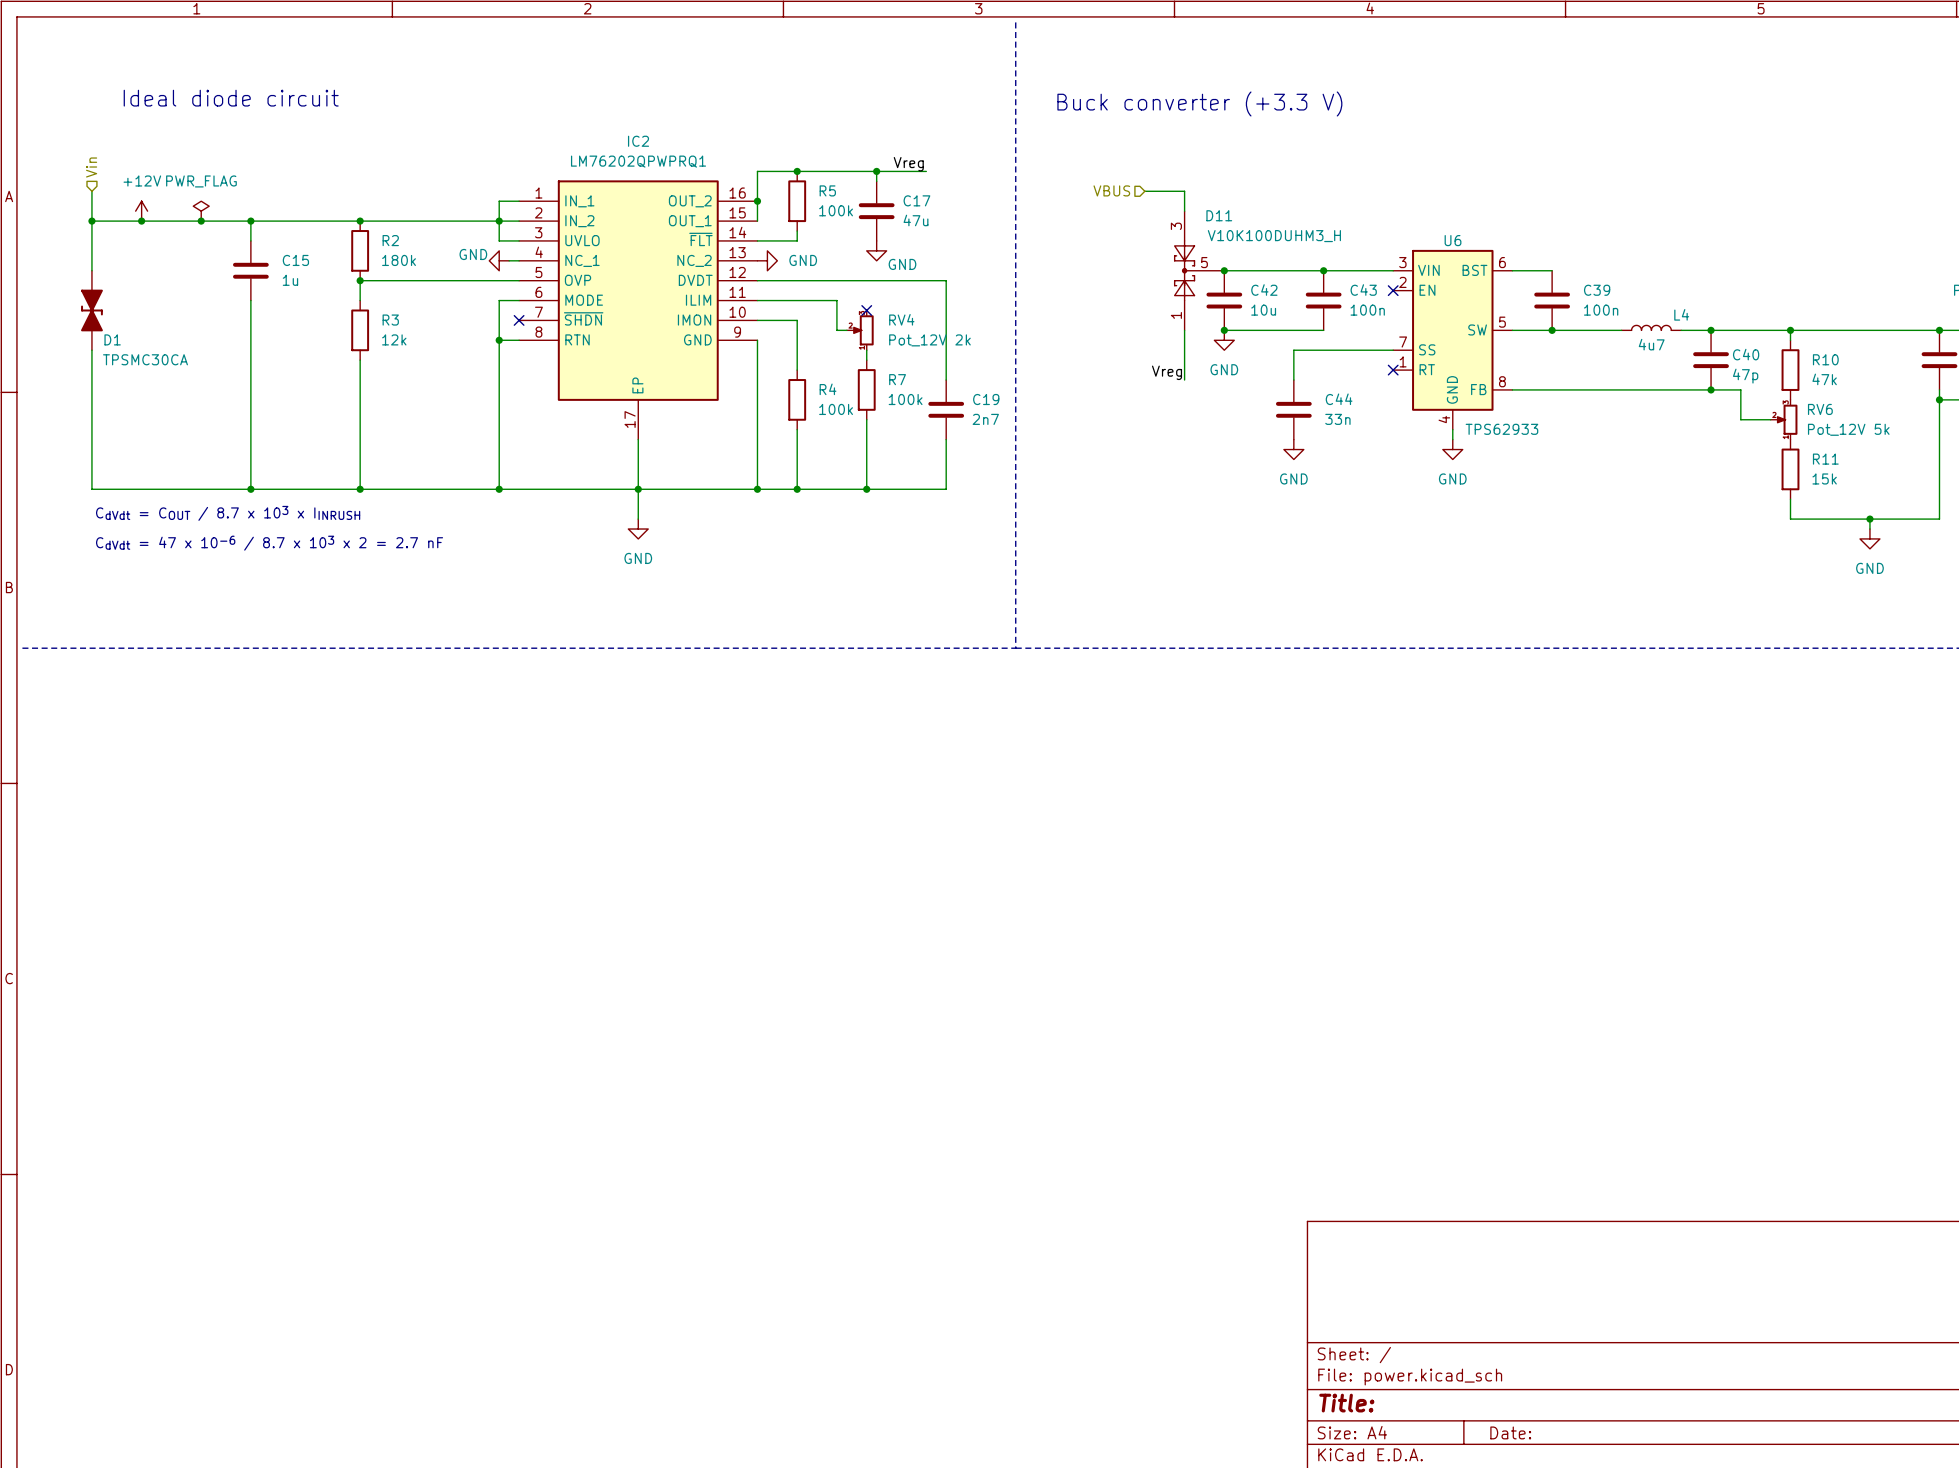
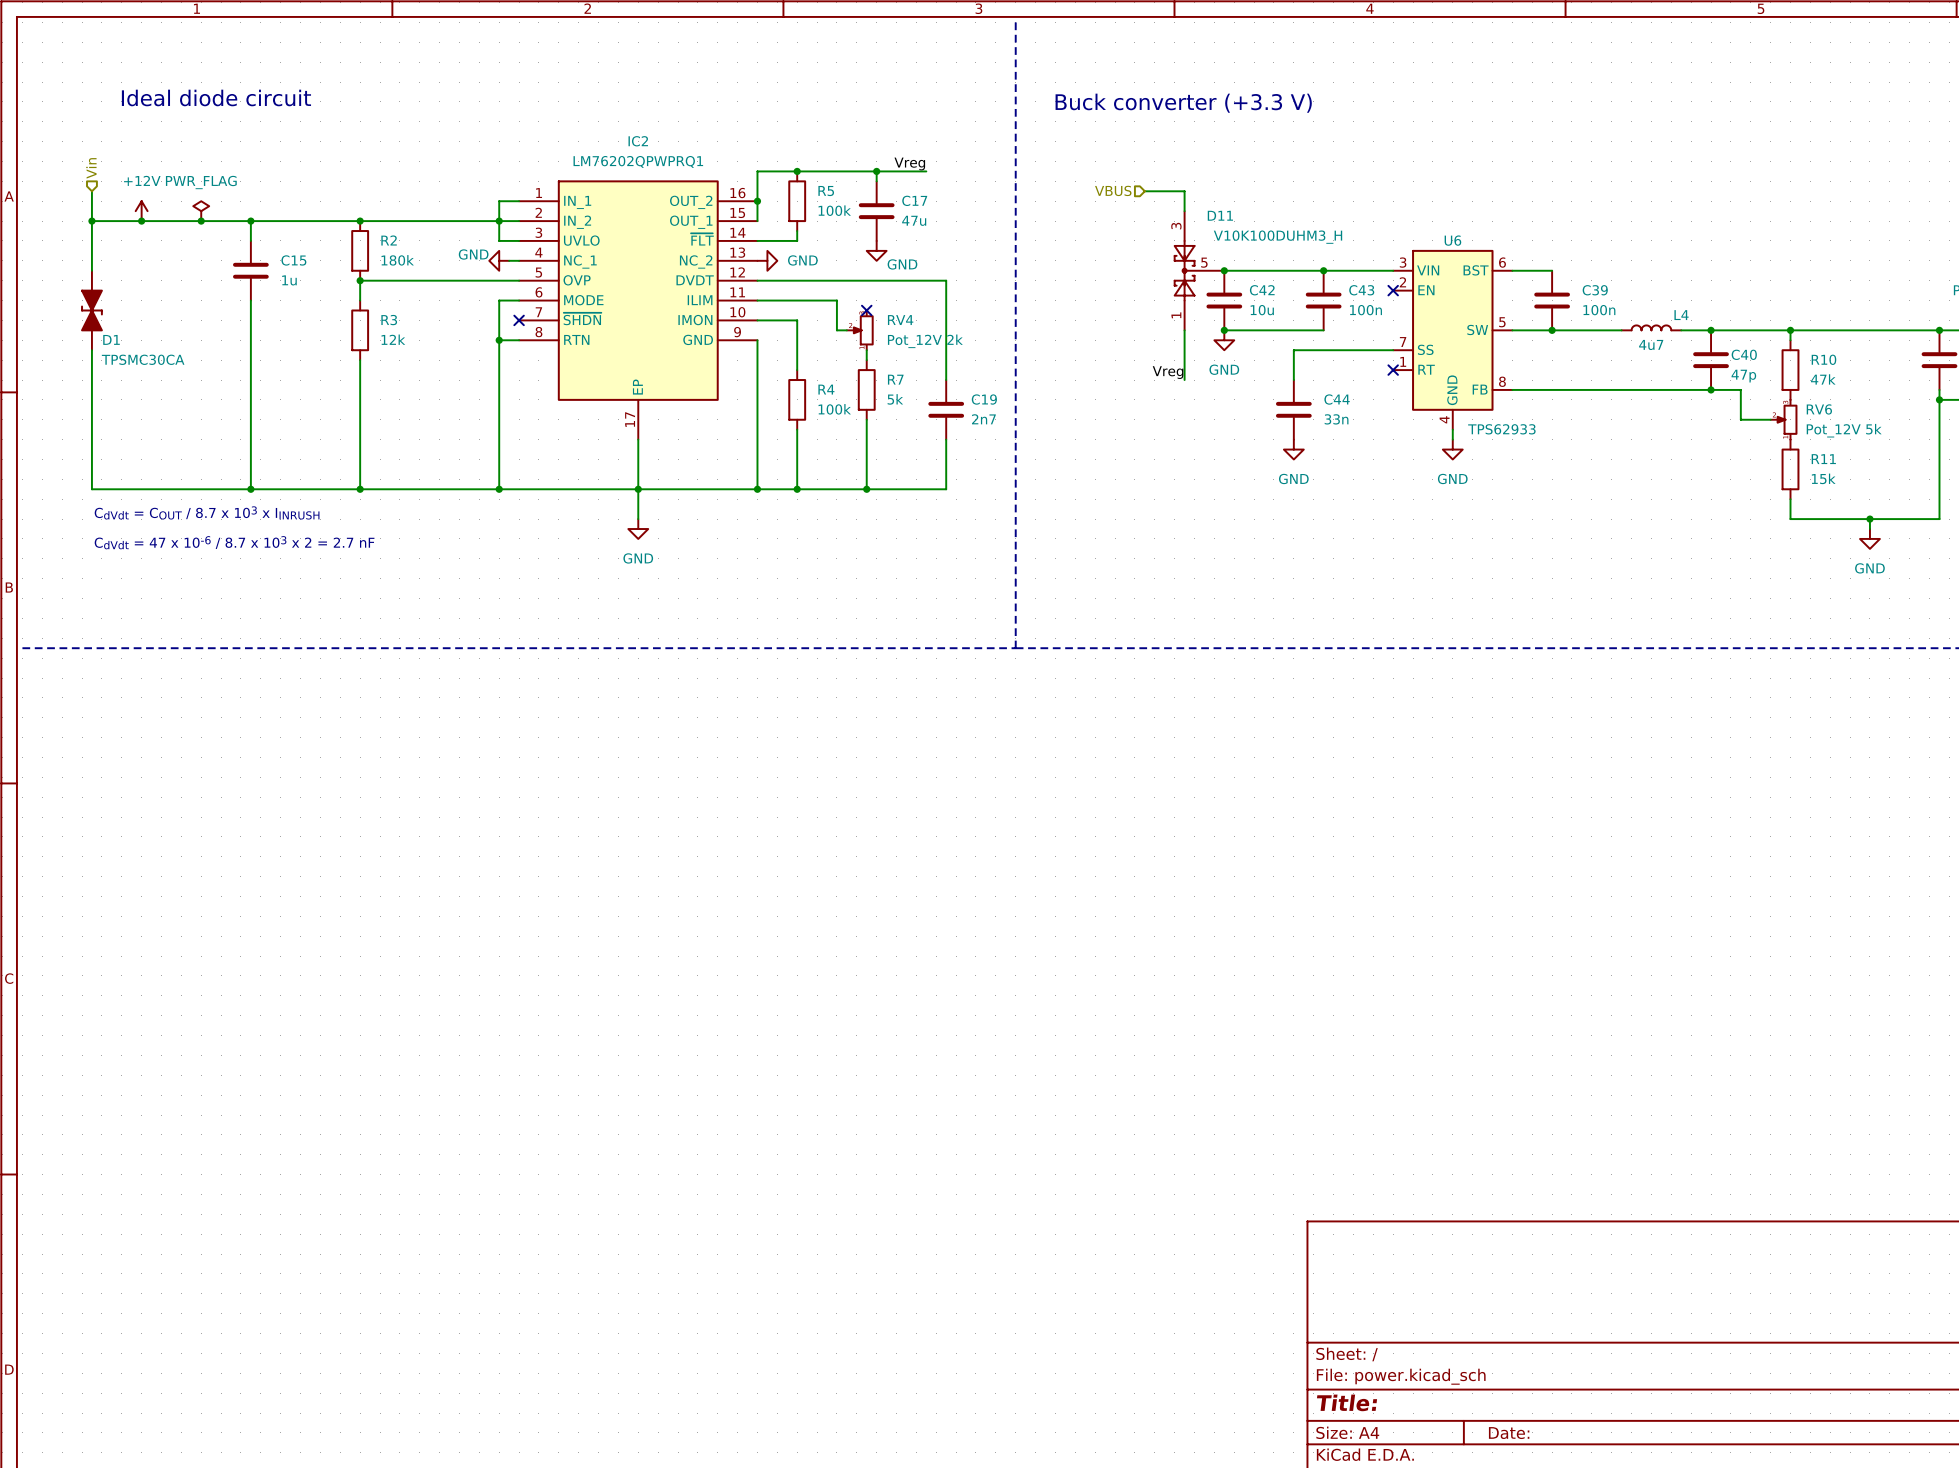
R7 value: 100k (905, 399) -> 5k (895, 399)

